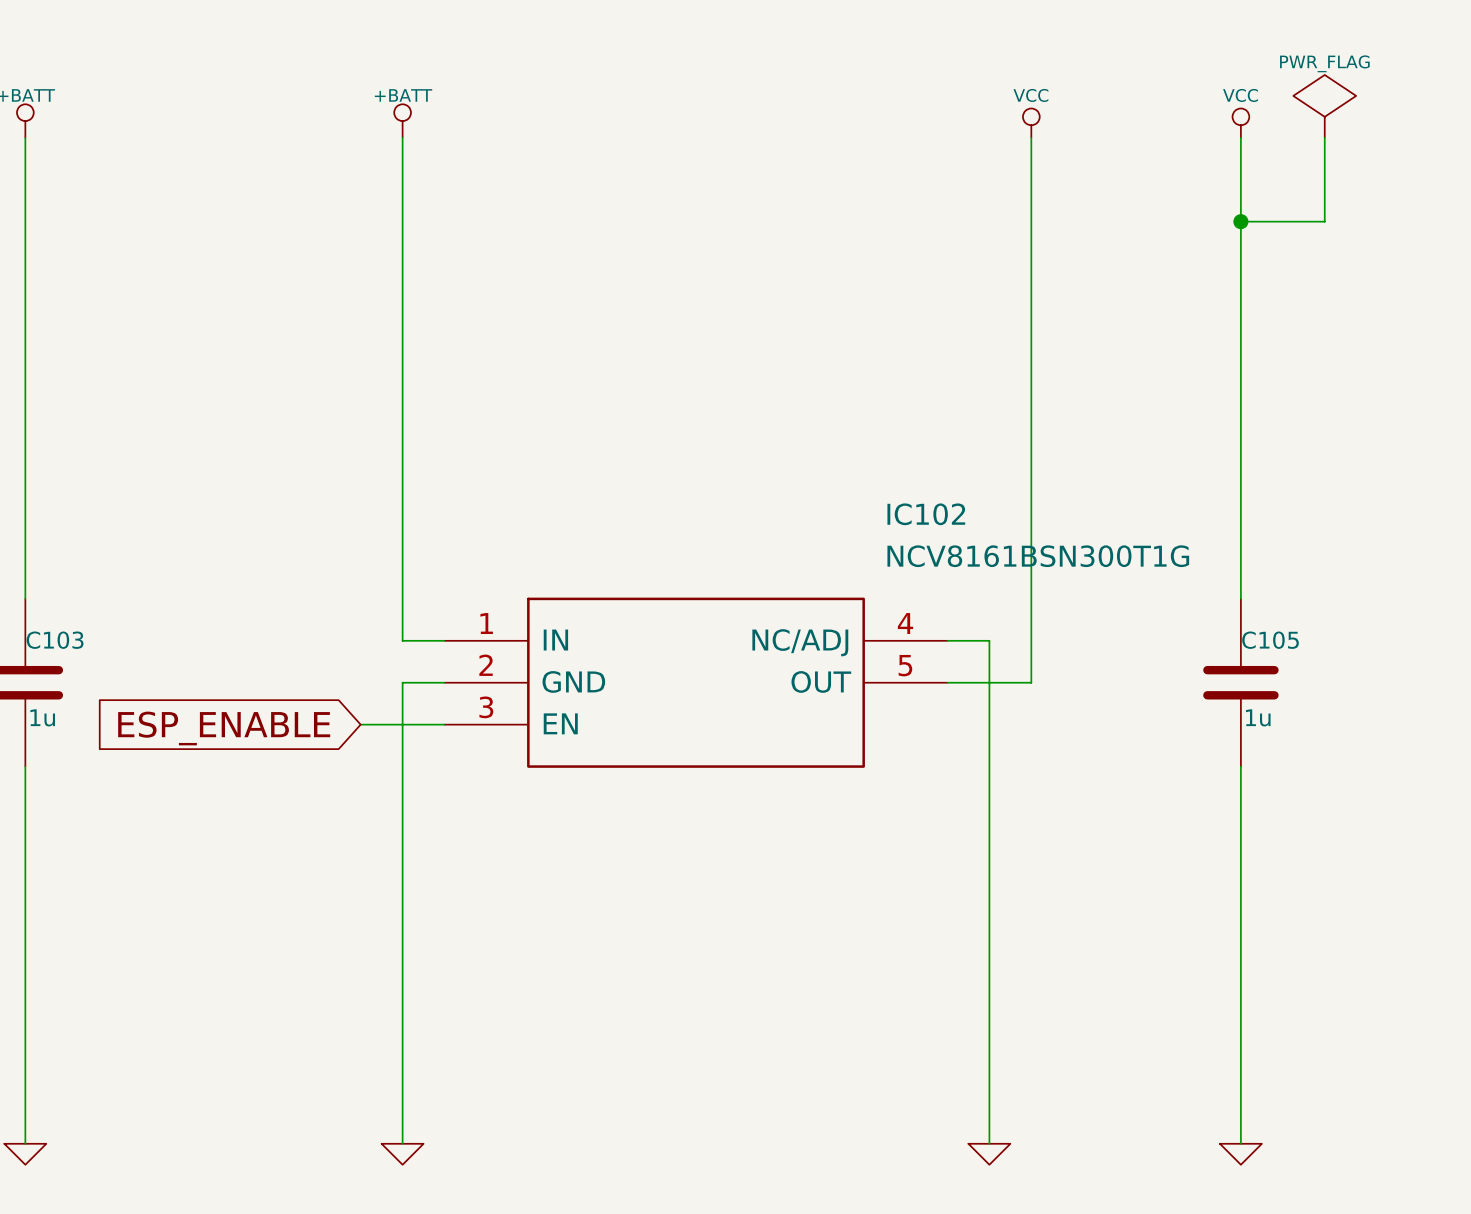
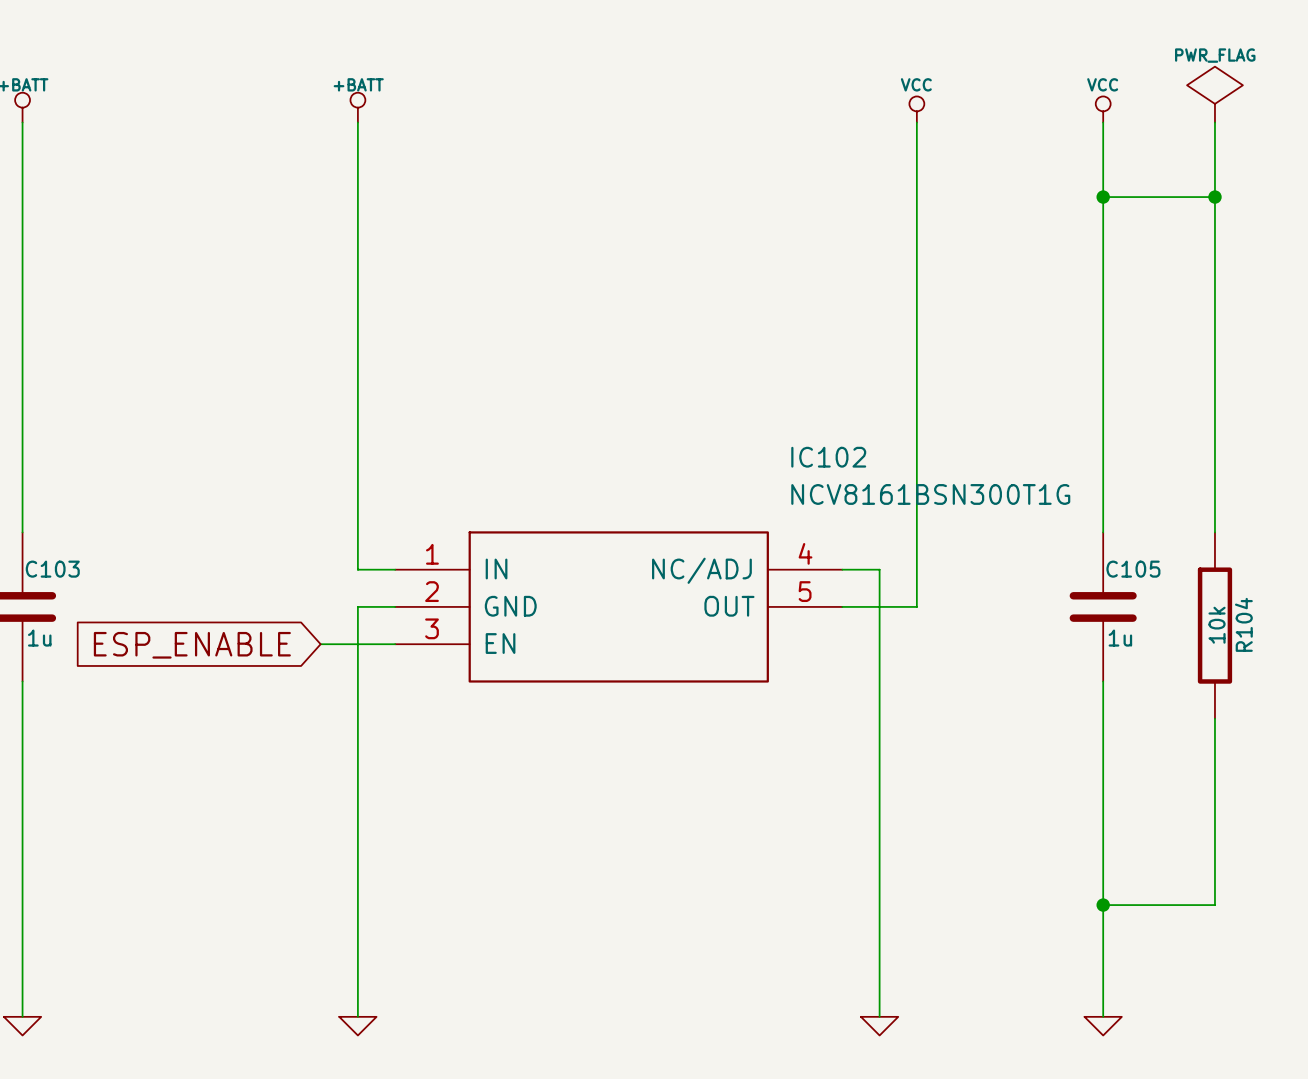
power symbol position: PWR_FLAG (1324, 106) -> PWR_FLAG (1214, 94)
wire: (1324, 137) (1324, 221) -> (1214, 197) (1177, 197)
wire: none -> (1214, 122) (1214, 532)
junction: none -> (1214, 197)
R104: none -> 10k (1214, 625)
wire: none -> (1214, 718) (1214, 905) (1103, 905)
junction: none -> (1103, 905)

